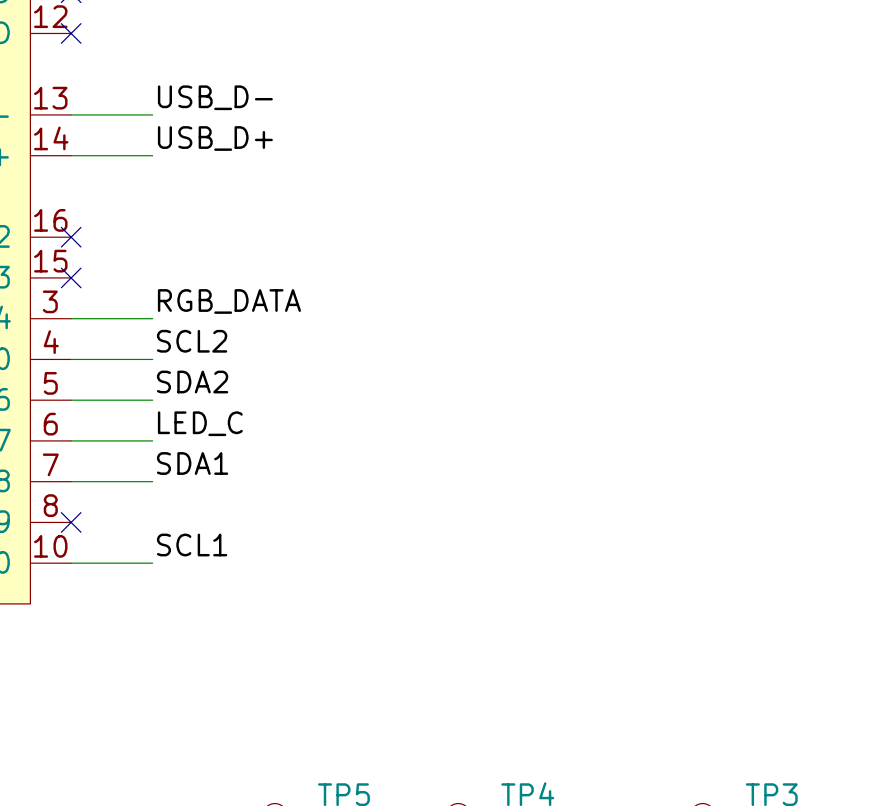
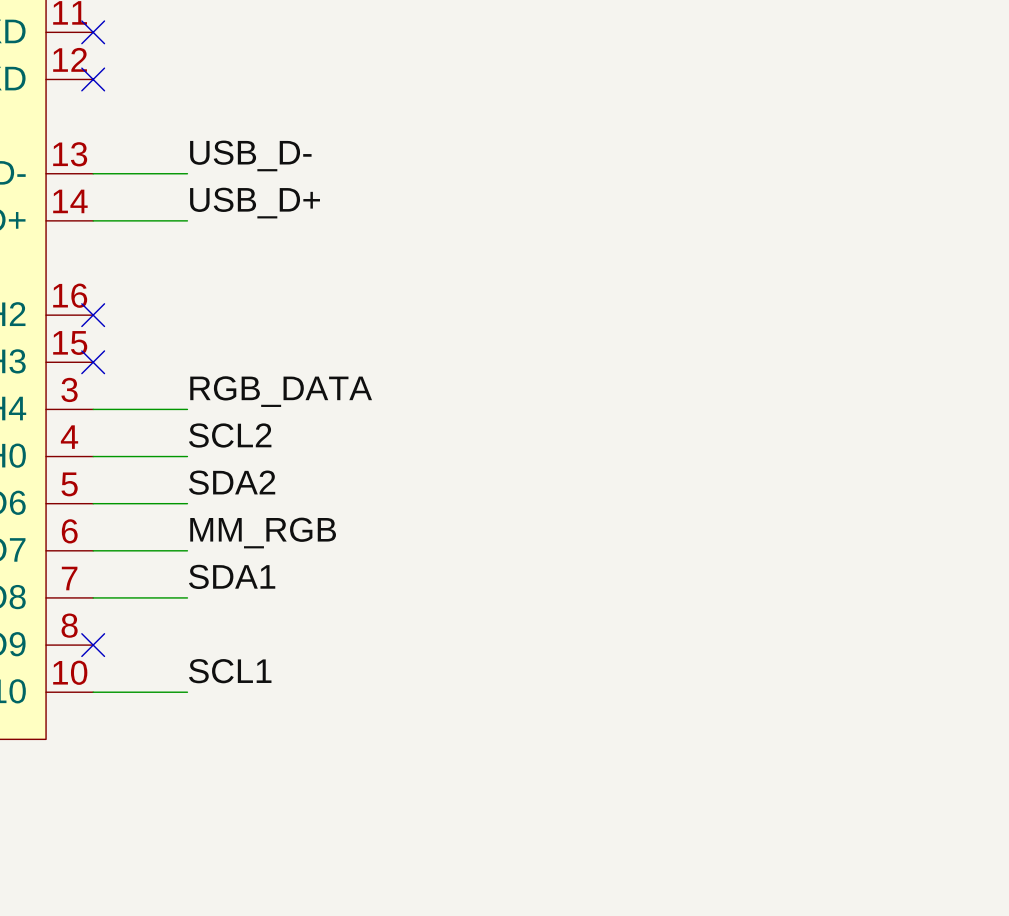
label: LED_C (200, 423) -> MM_RGB (263, 533)

